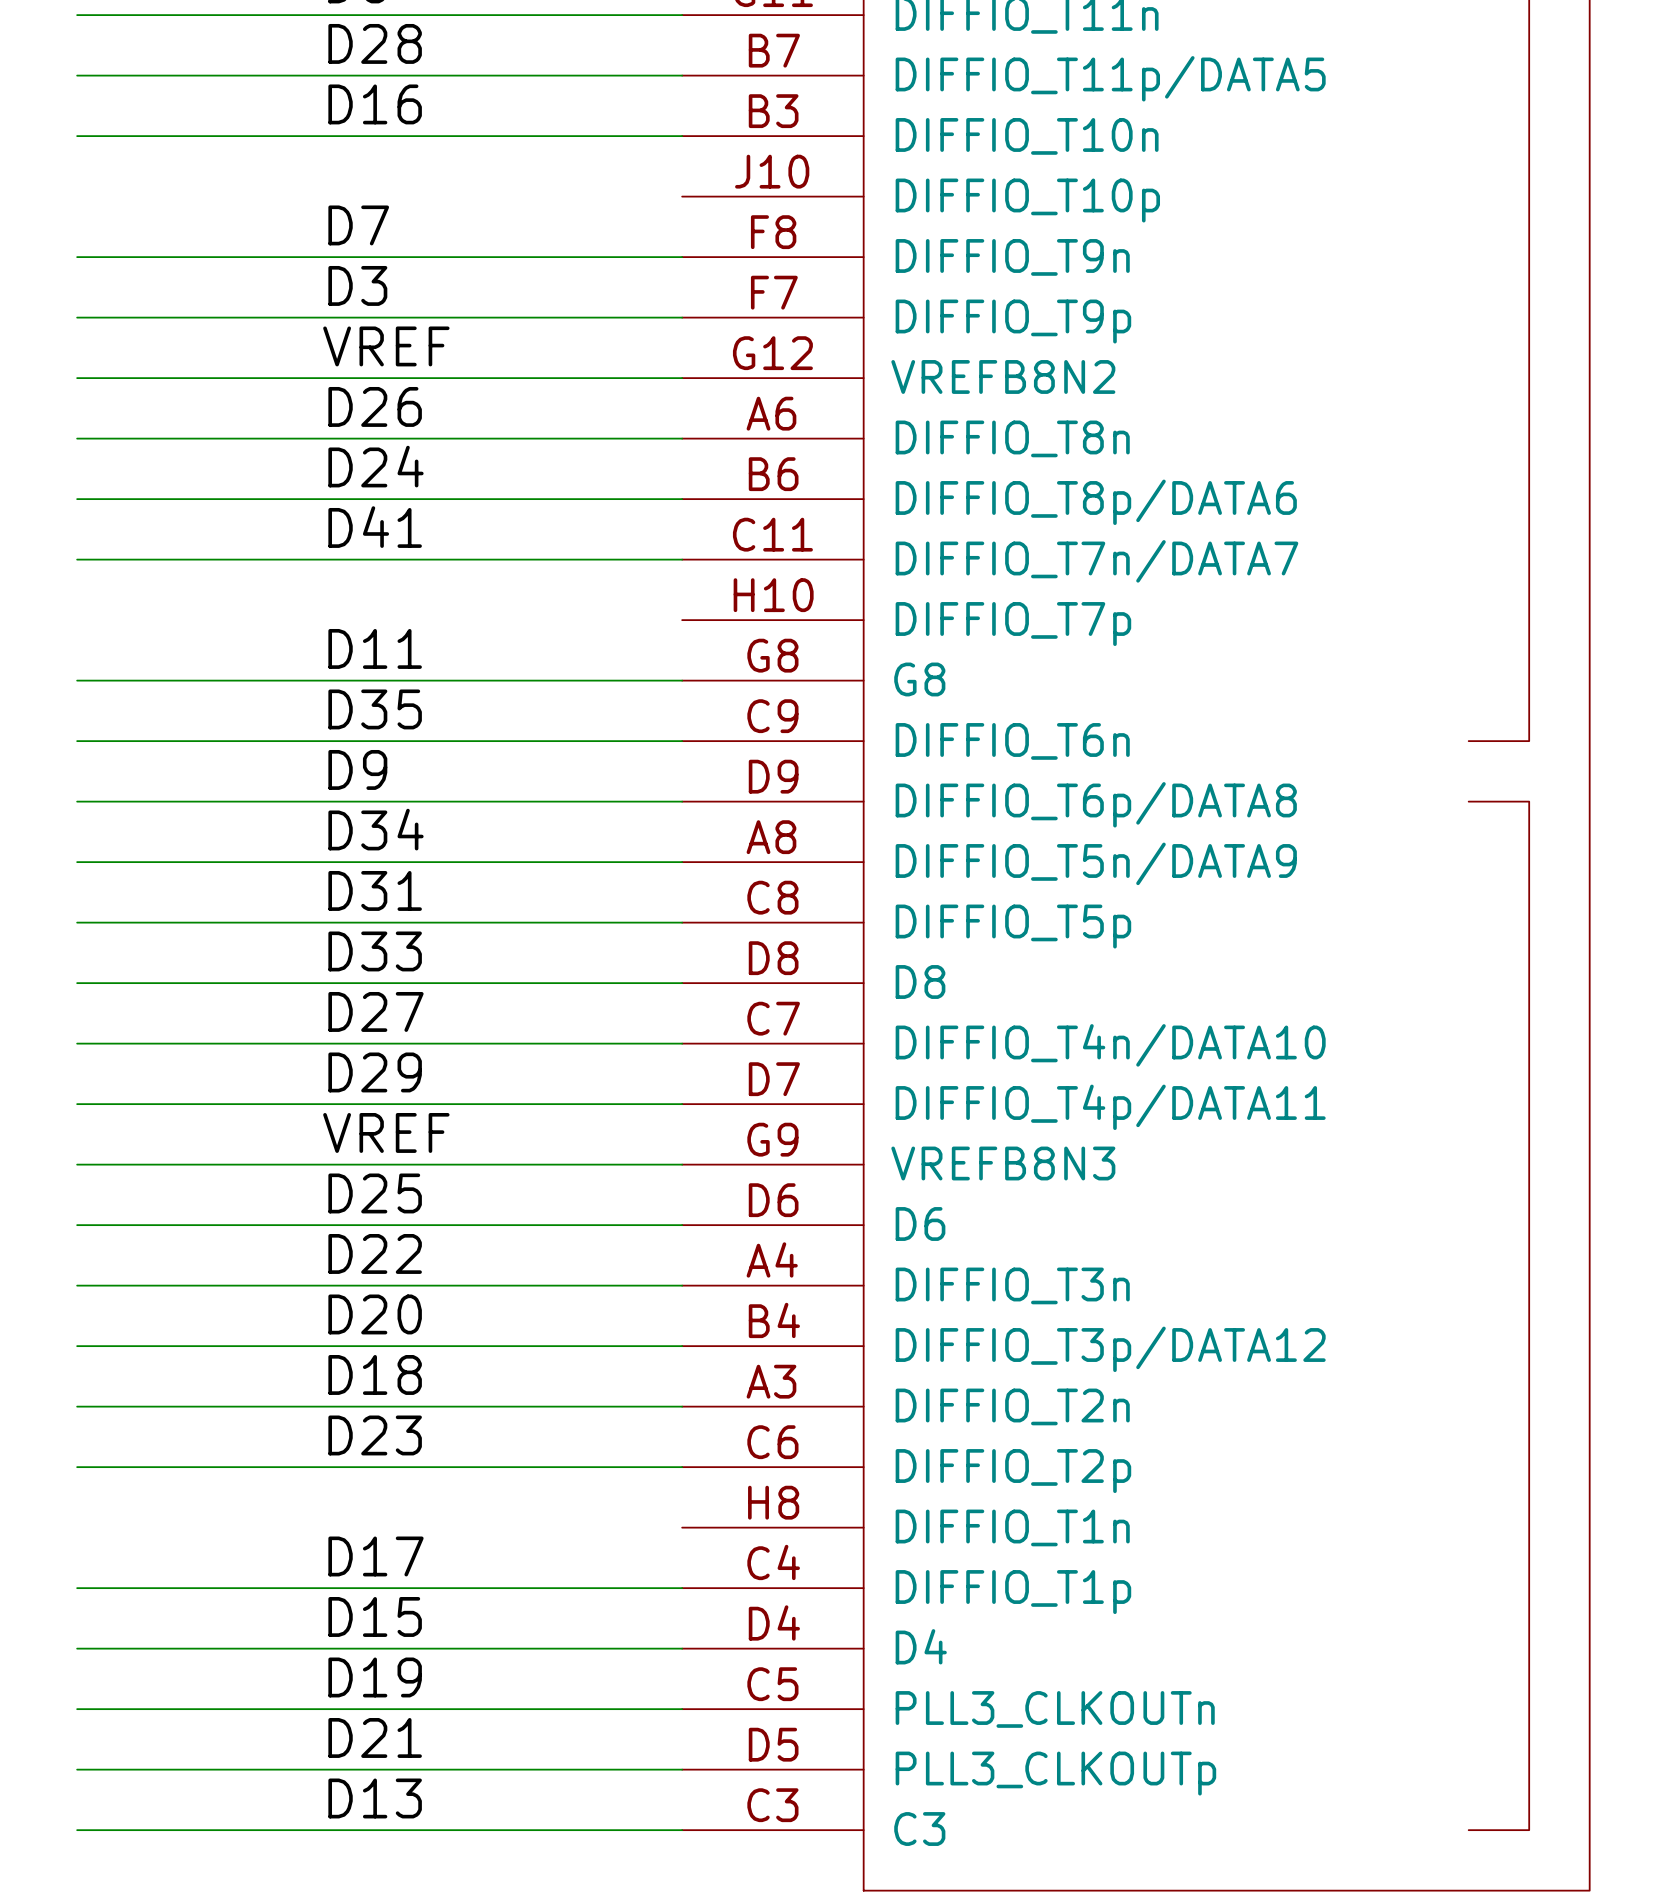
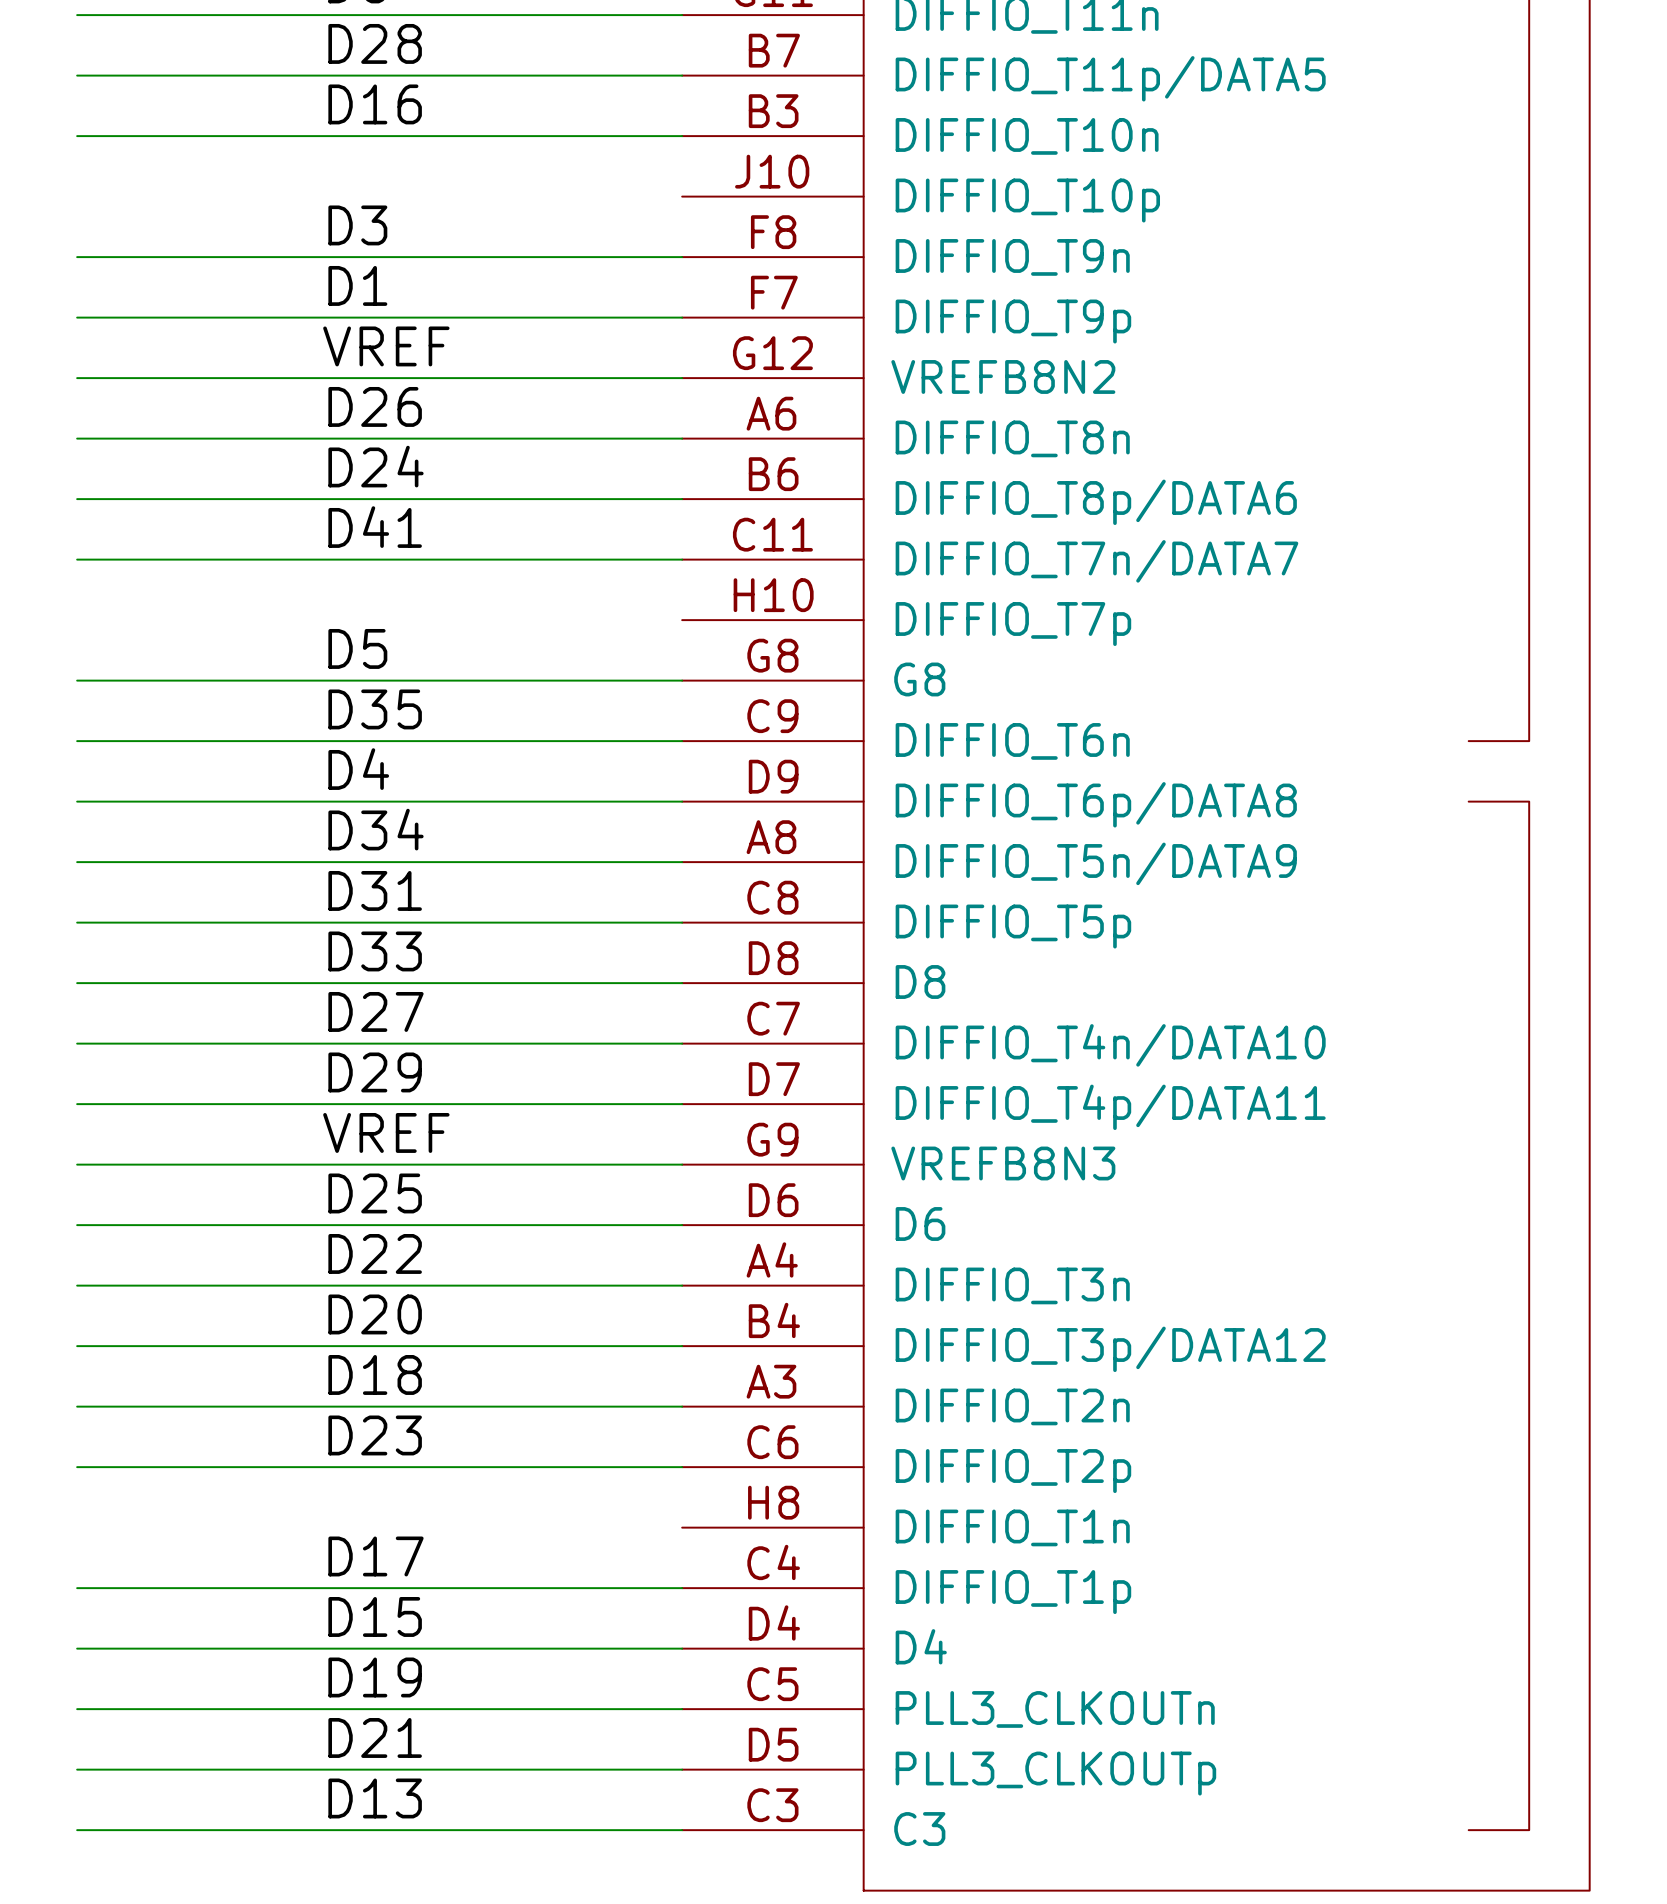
label: D7 (358, 225) -> D3 (357, 225)
label: D3 (357, 285) -> D1 (357, 285)
label: D11 (375, 648) -> D5 (357, 648)
label: D9 (357, 769) -> D4 (358, 769)

